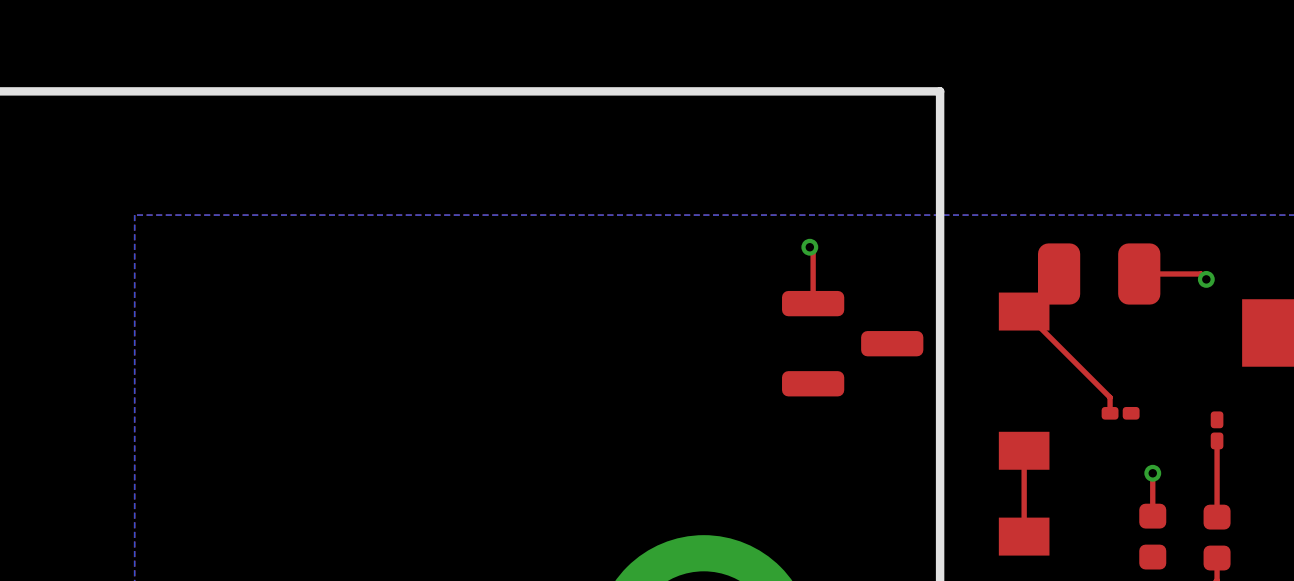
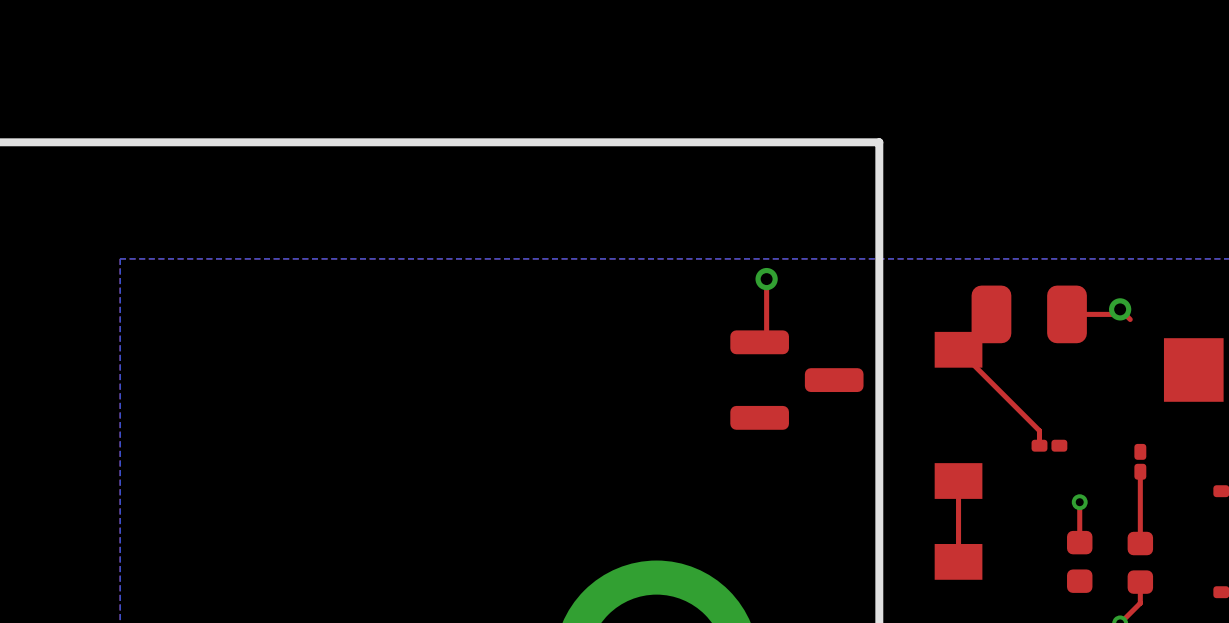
top track: (809, 247) (813, 250) (813, 303) -> (766, 279) (766, 335) (759, 342)
via position: (809, 247) -> (766, 279)
via position: (1206, 279) -> (1120, 309)

